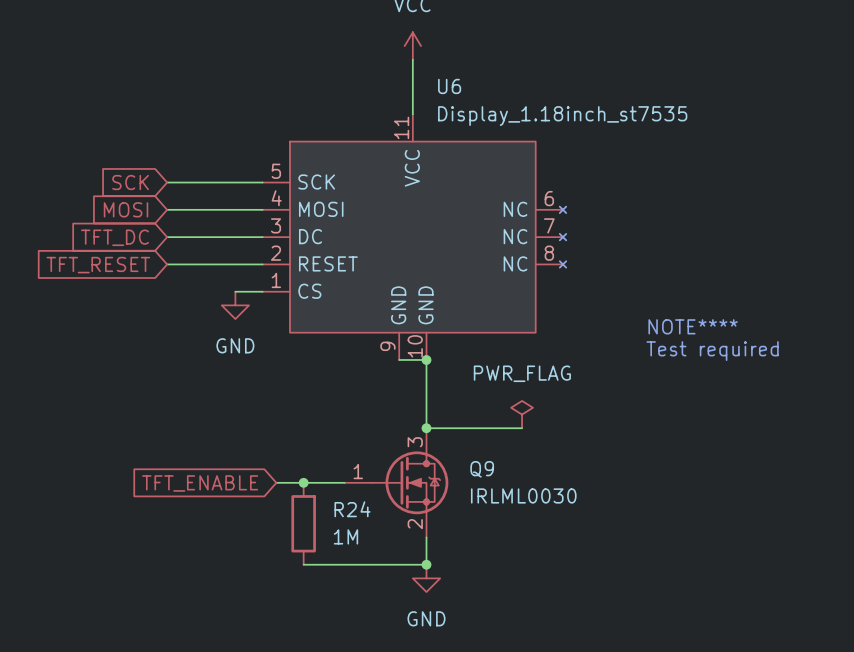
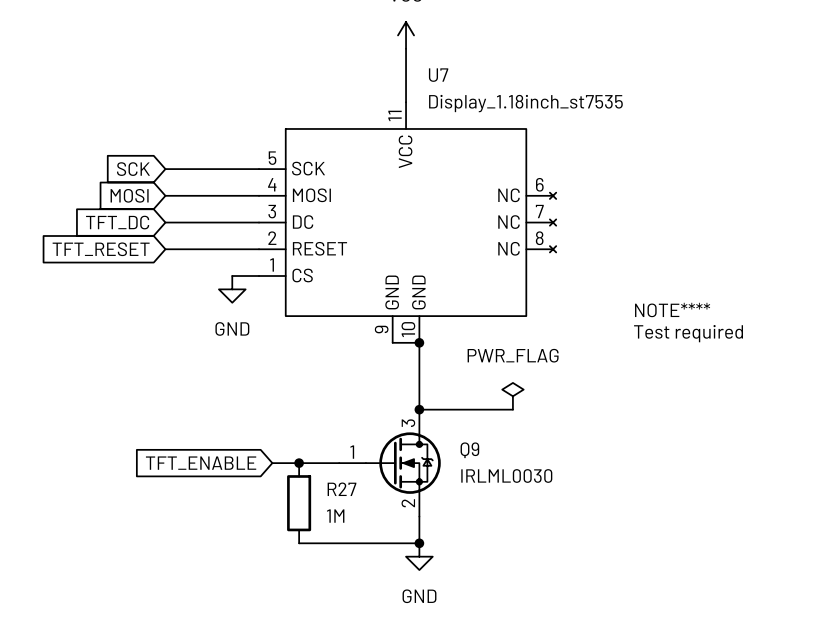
U6 name: U6 (449, 86) -> U7 (438, 75)
R24 name: R24 (352, 509) -> R27 (342, 489)

